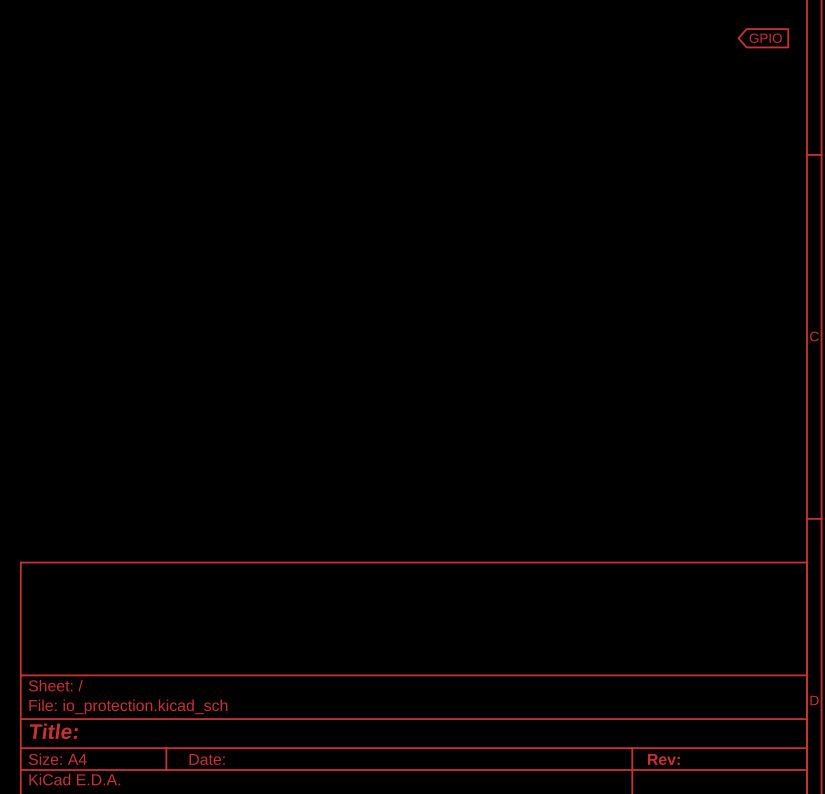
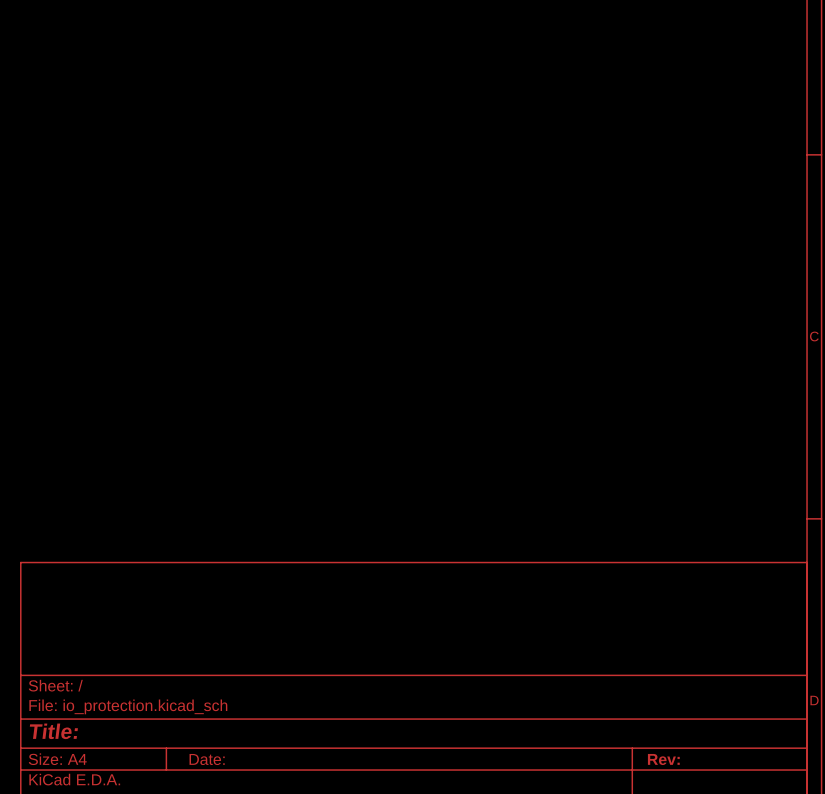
global label: GPIO (765, 38) -> none

